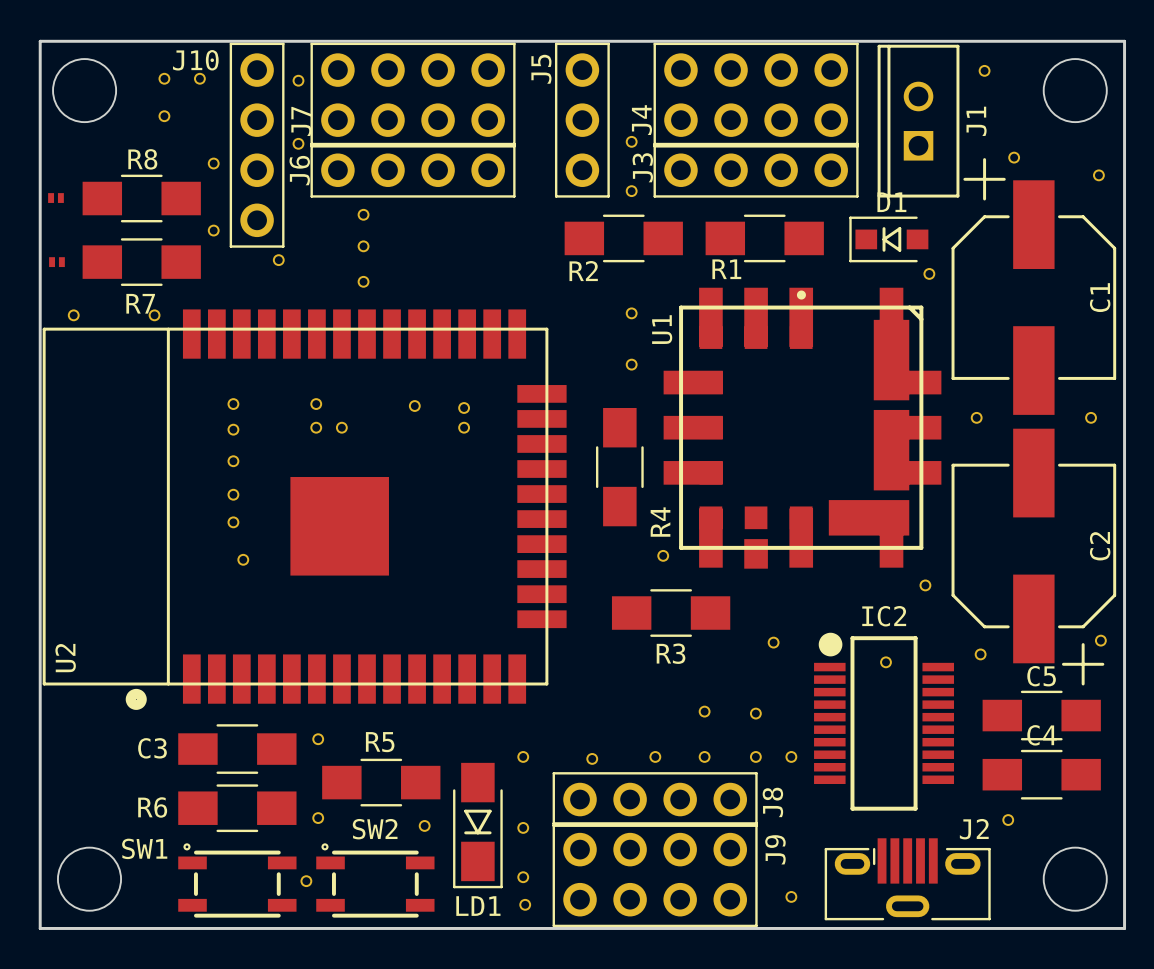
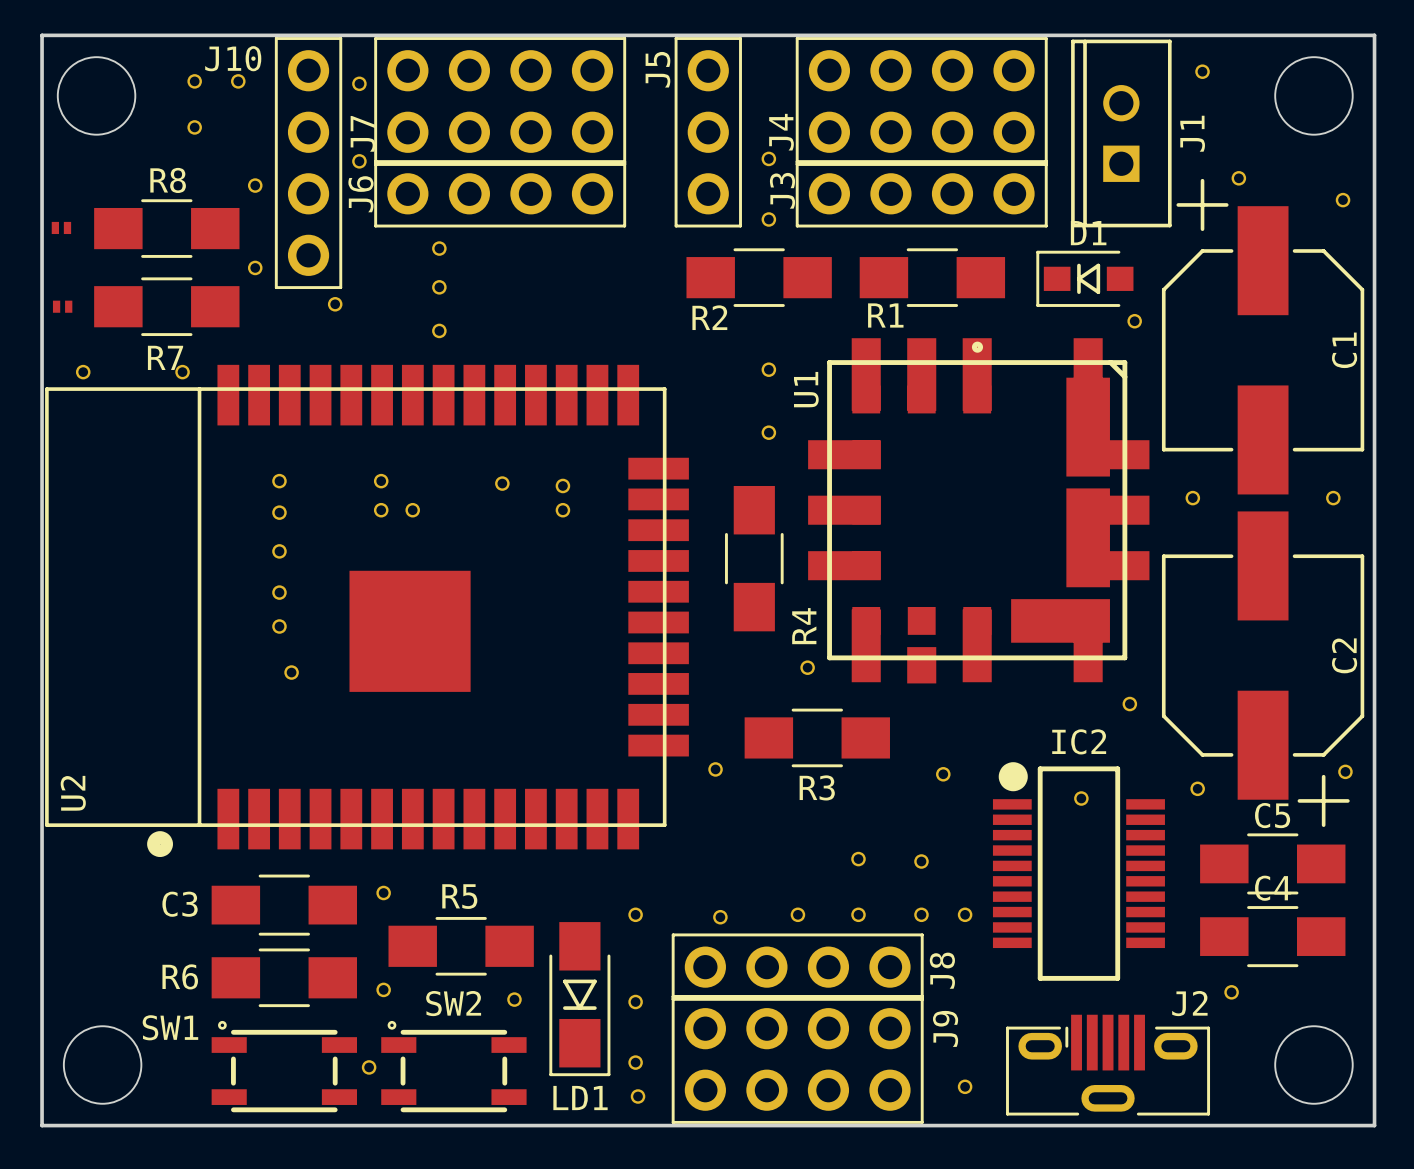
part: none -> (715, 769)

